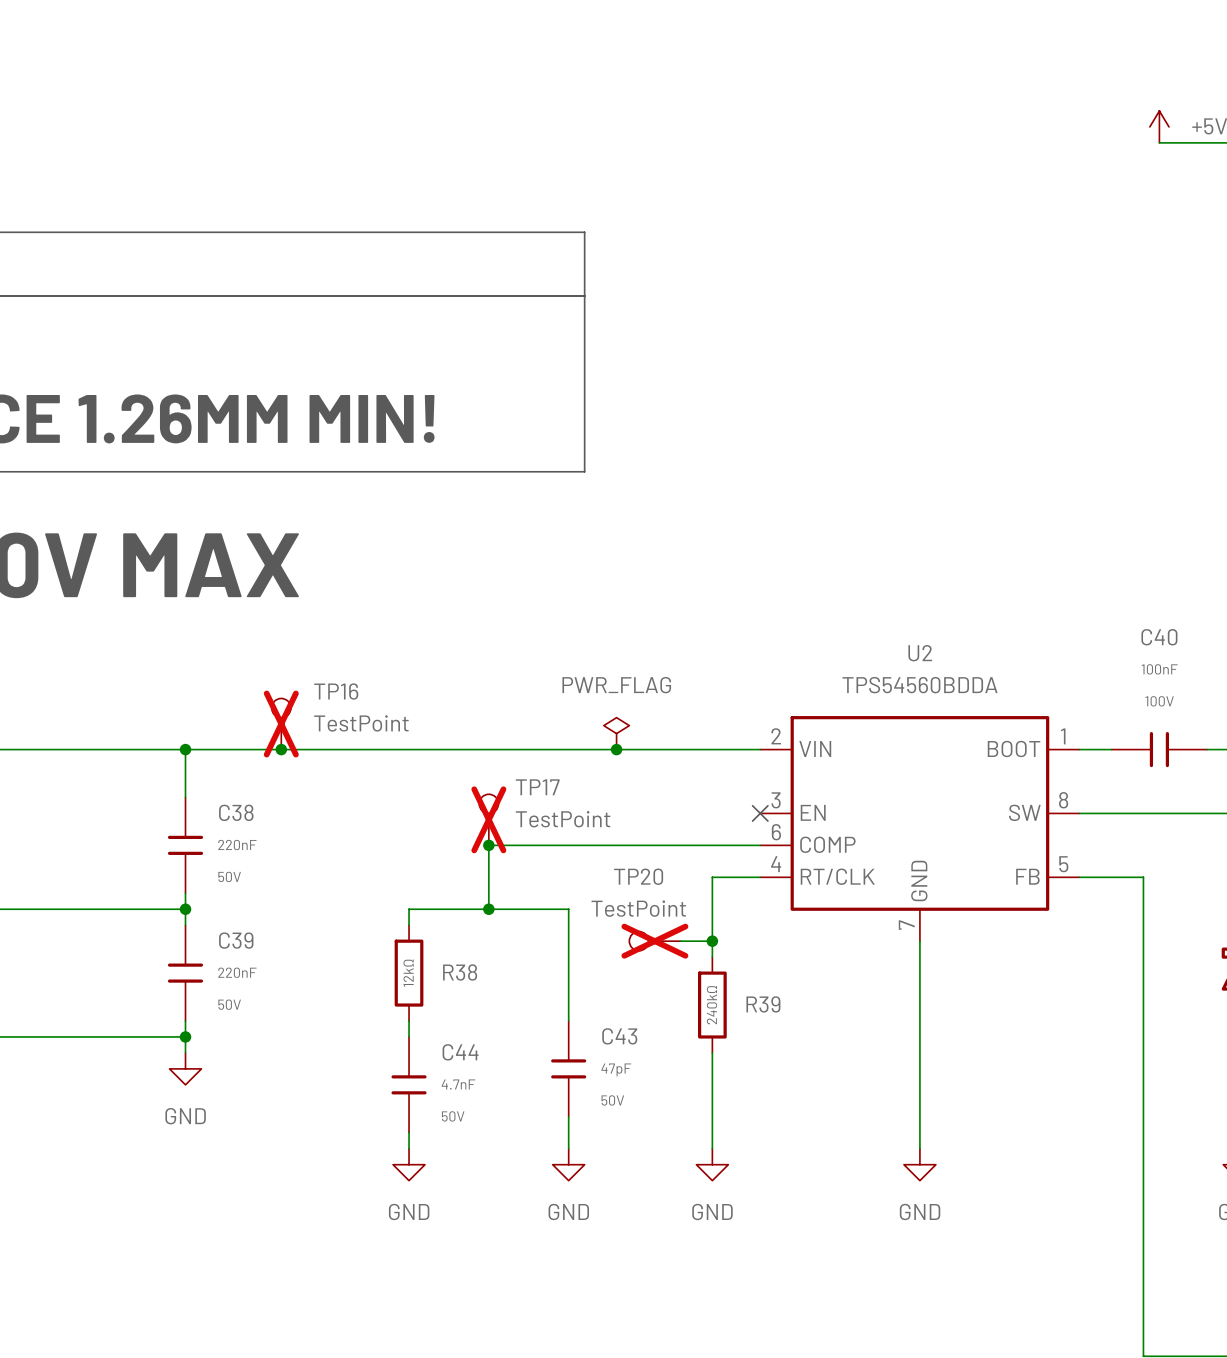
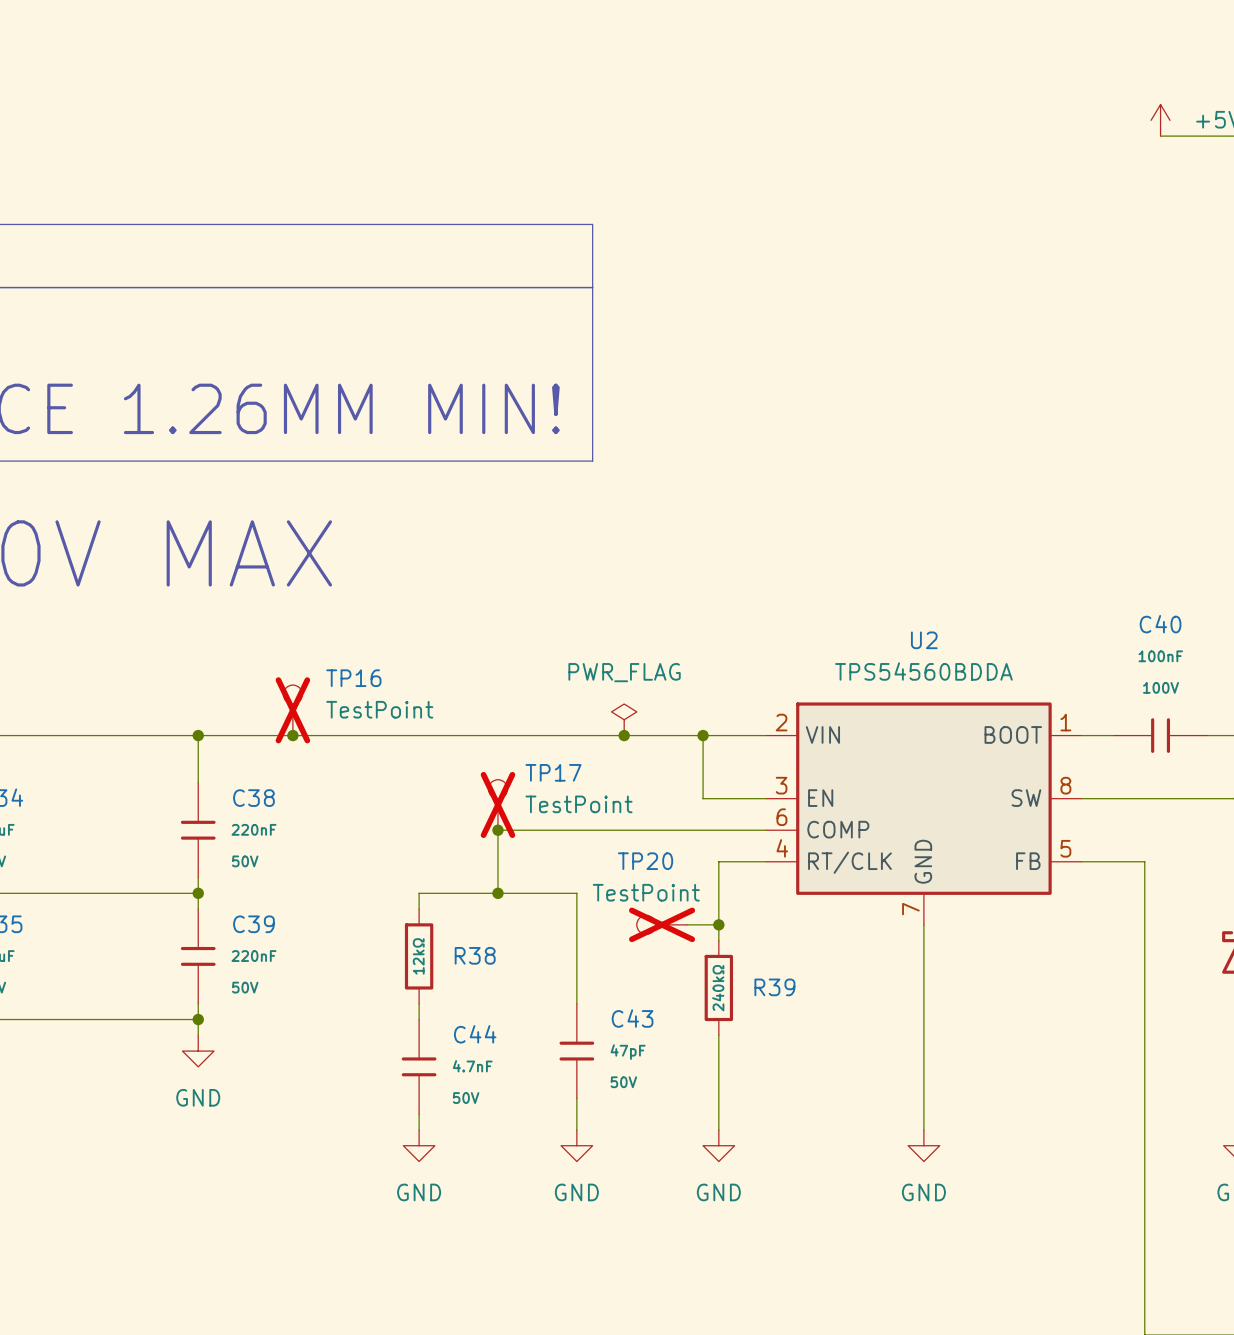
wire: none -> (703, 735) (703, 798) (766, 798)
junction: none -> (703, 735)
no-connect mark: (760, 813) -> none

